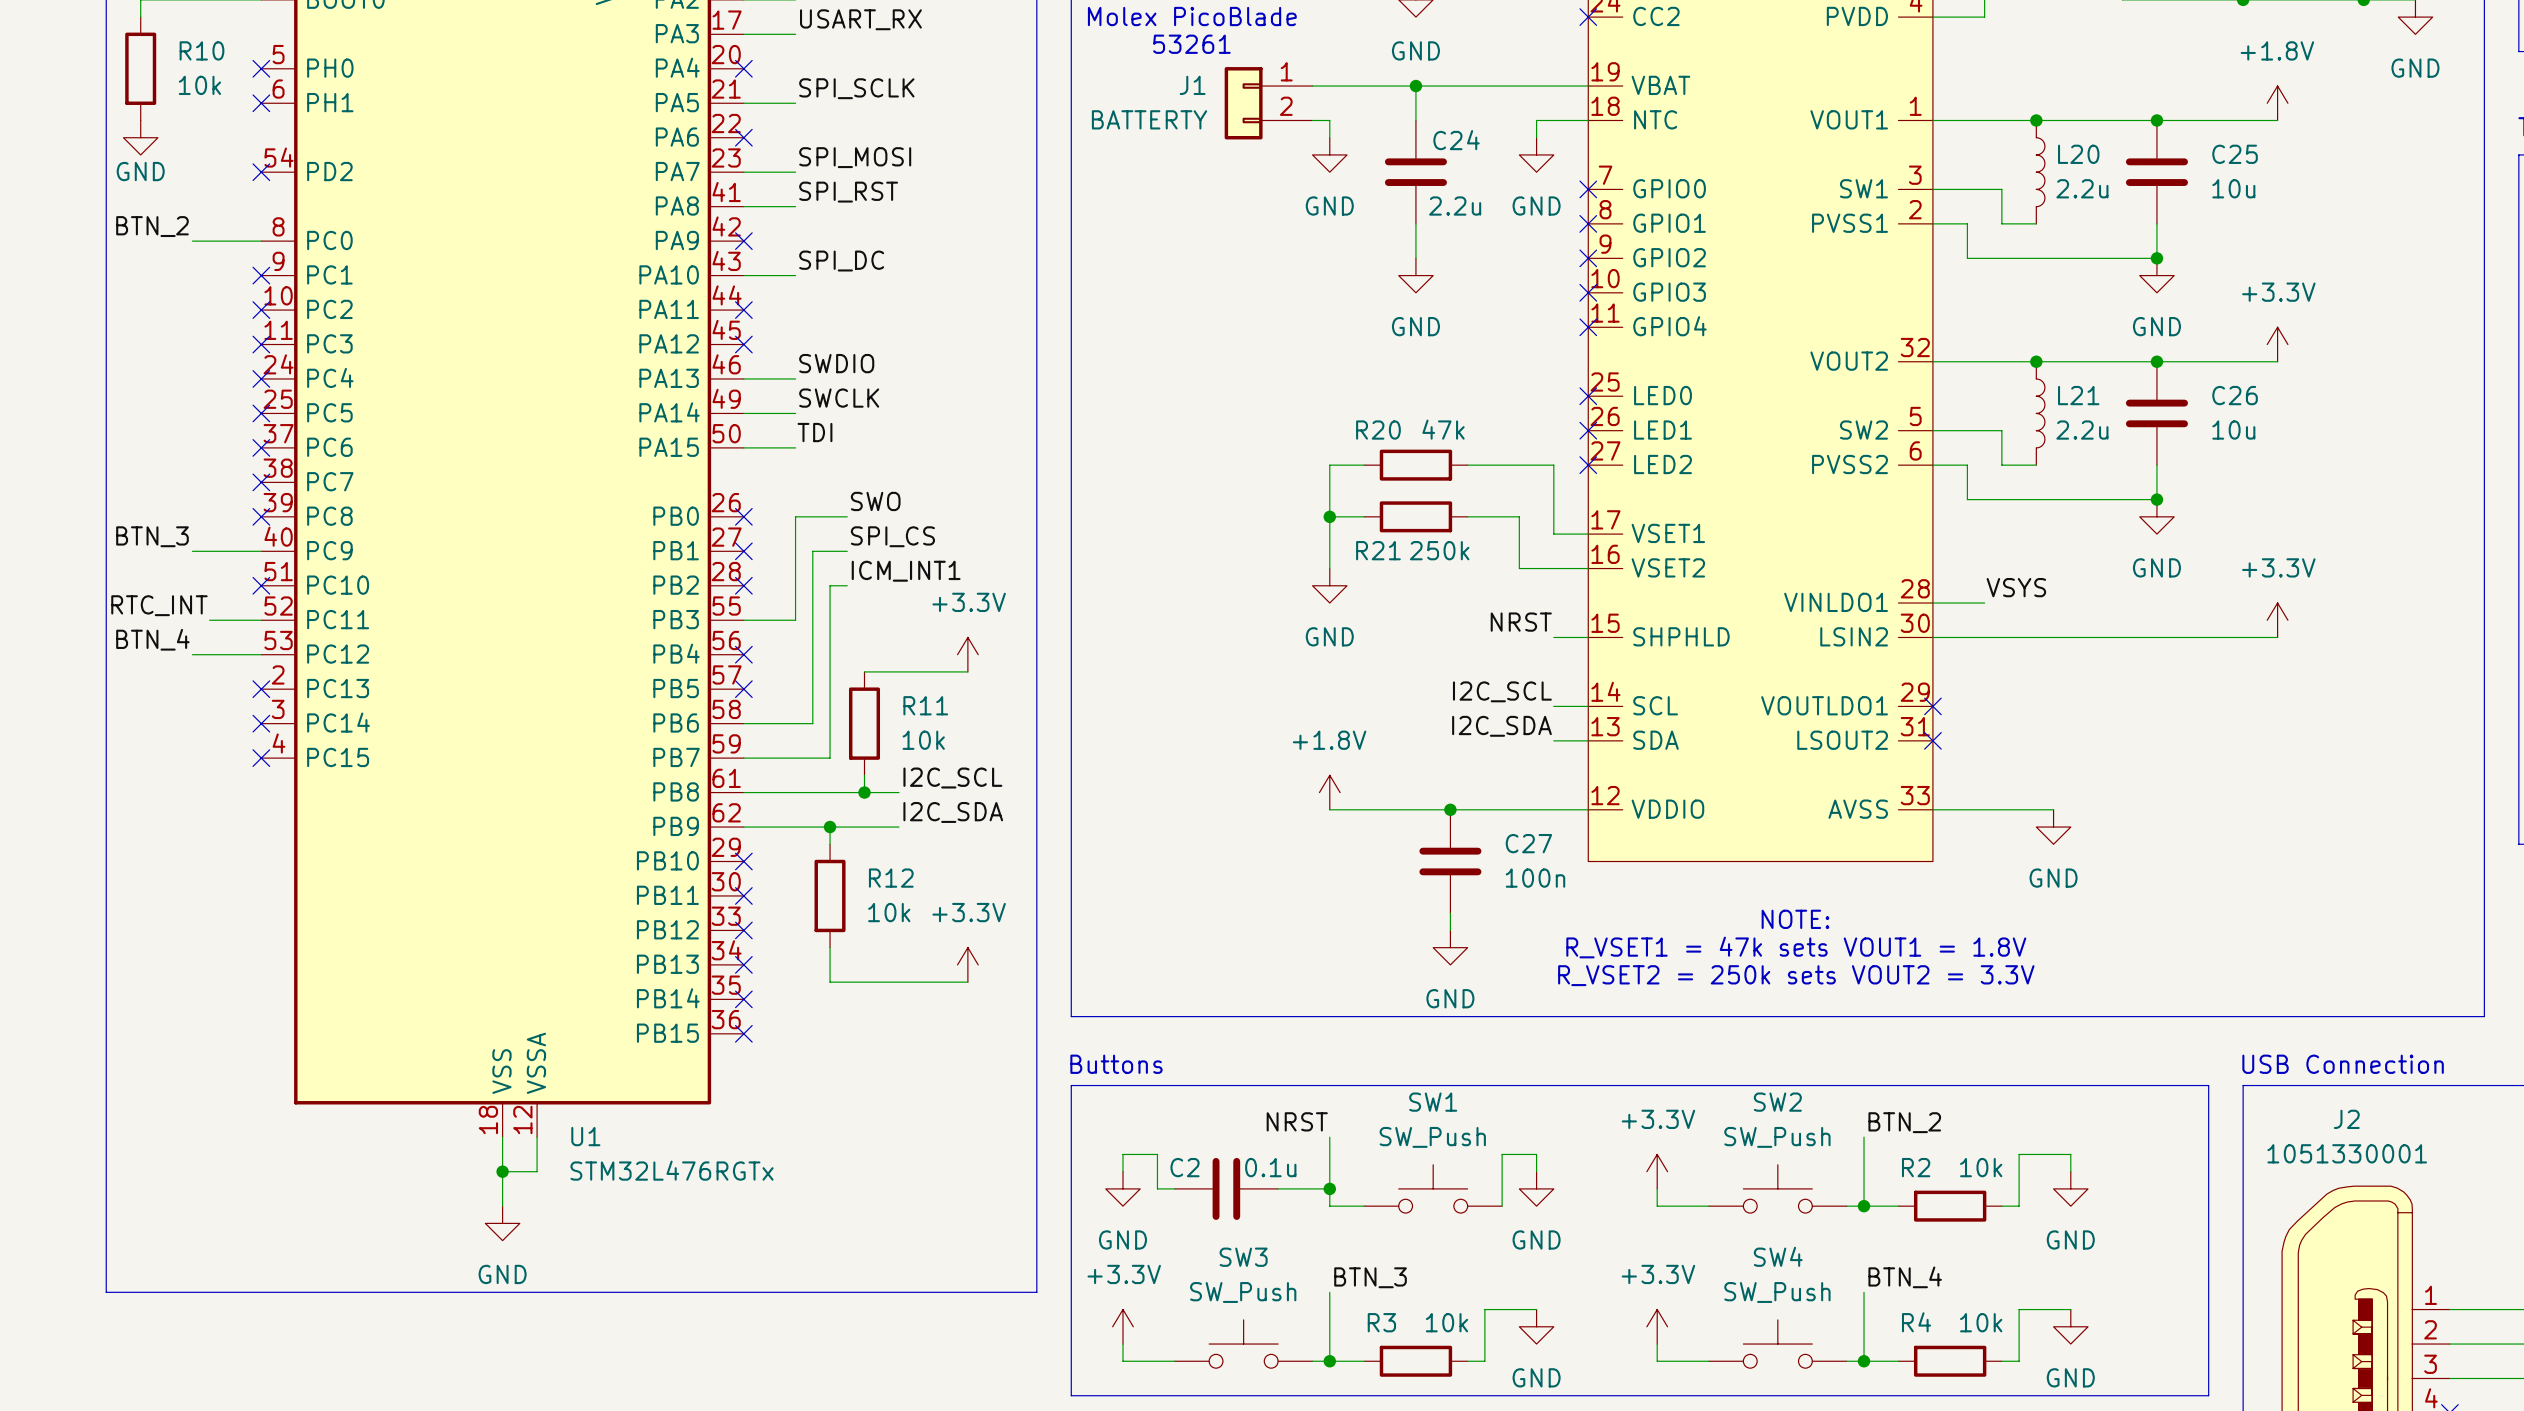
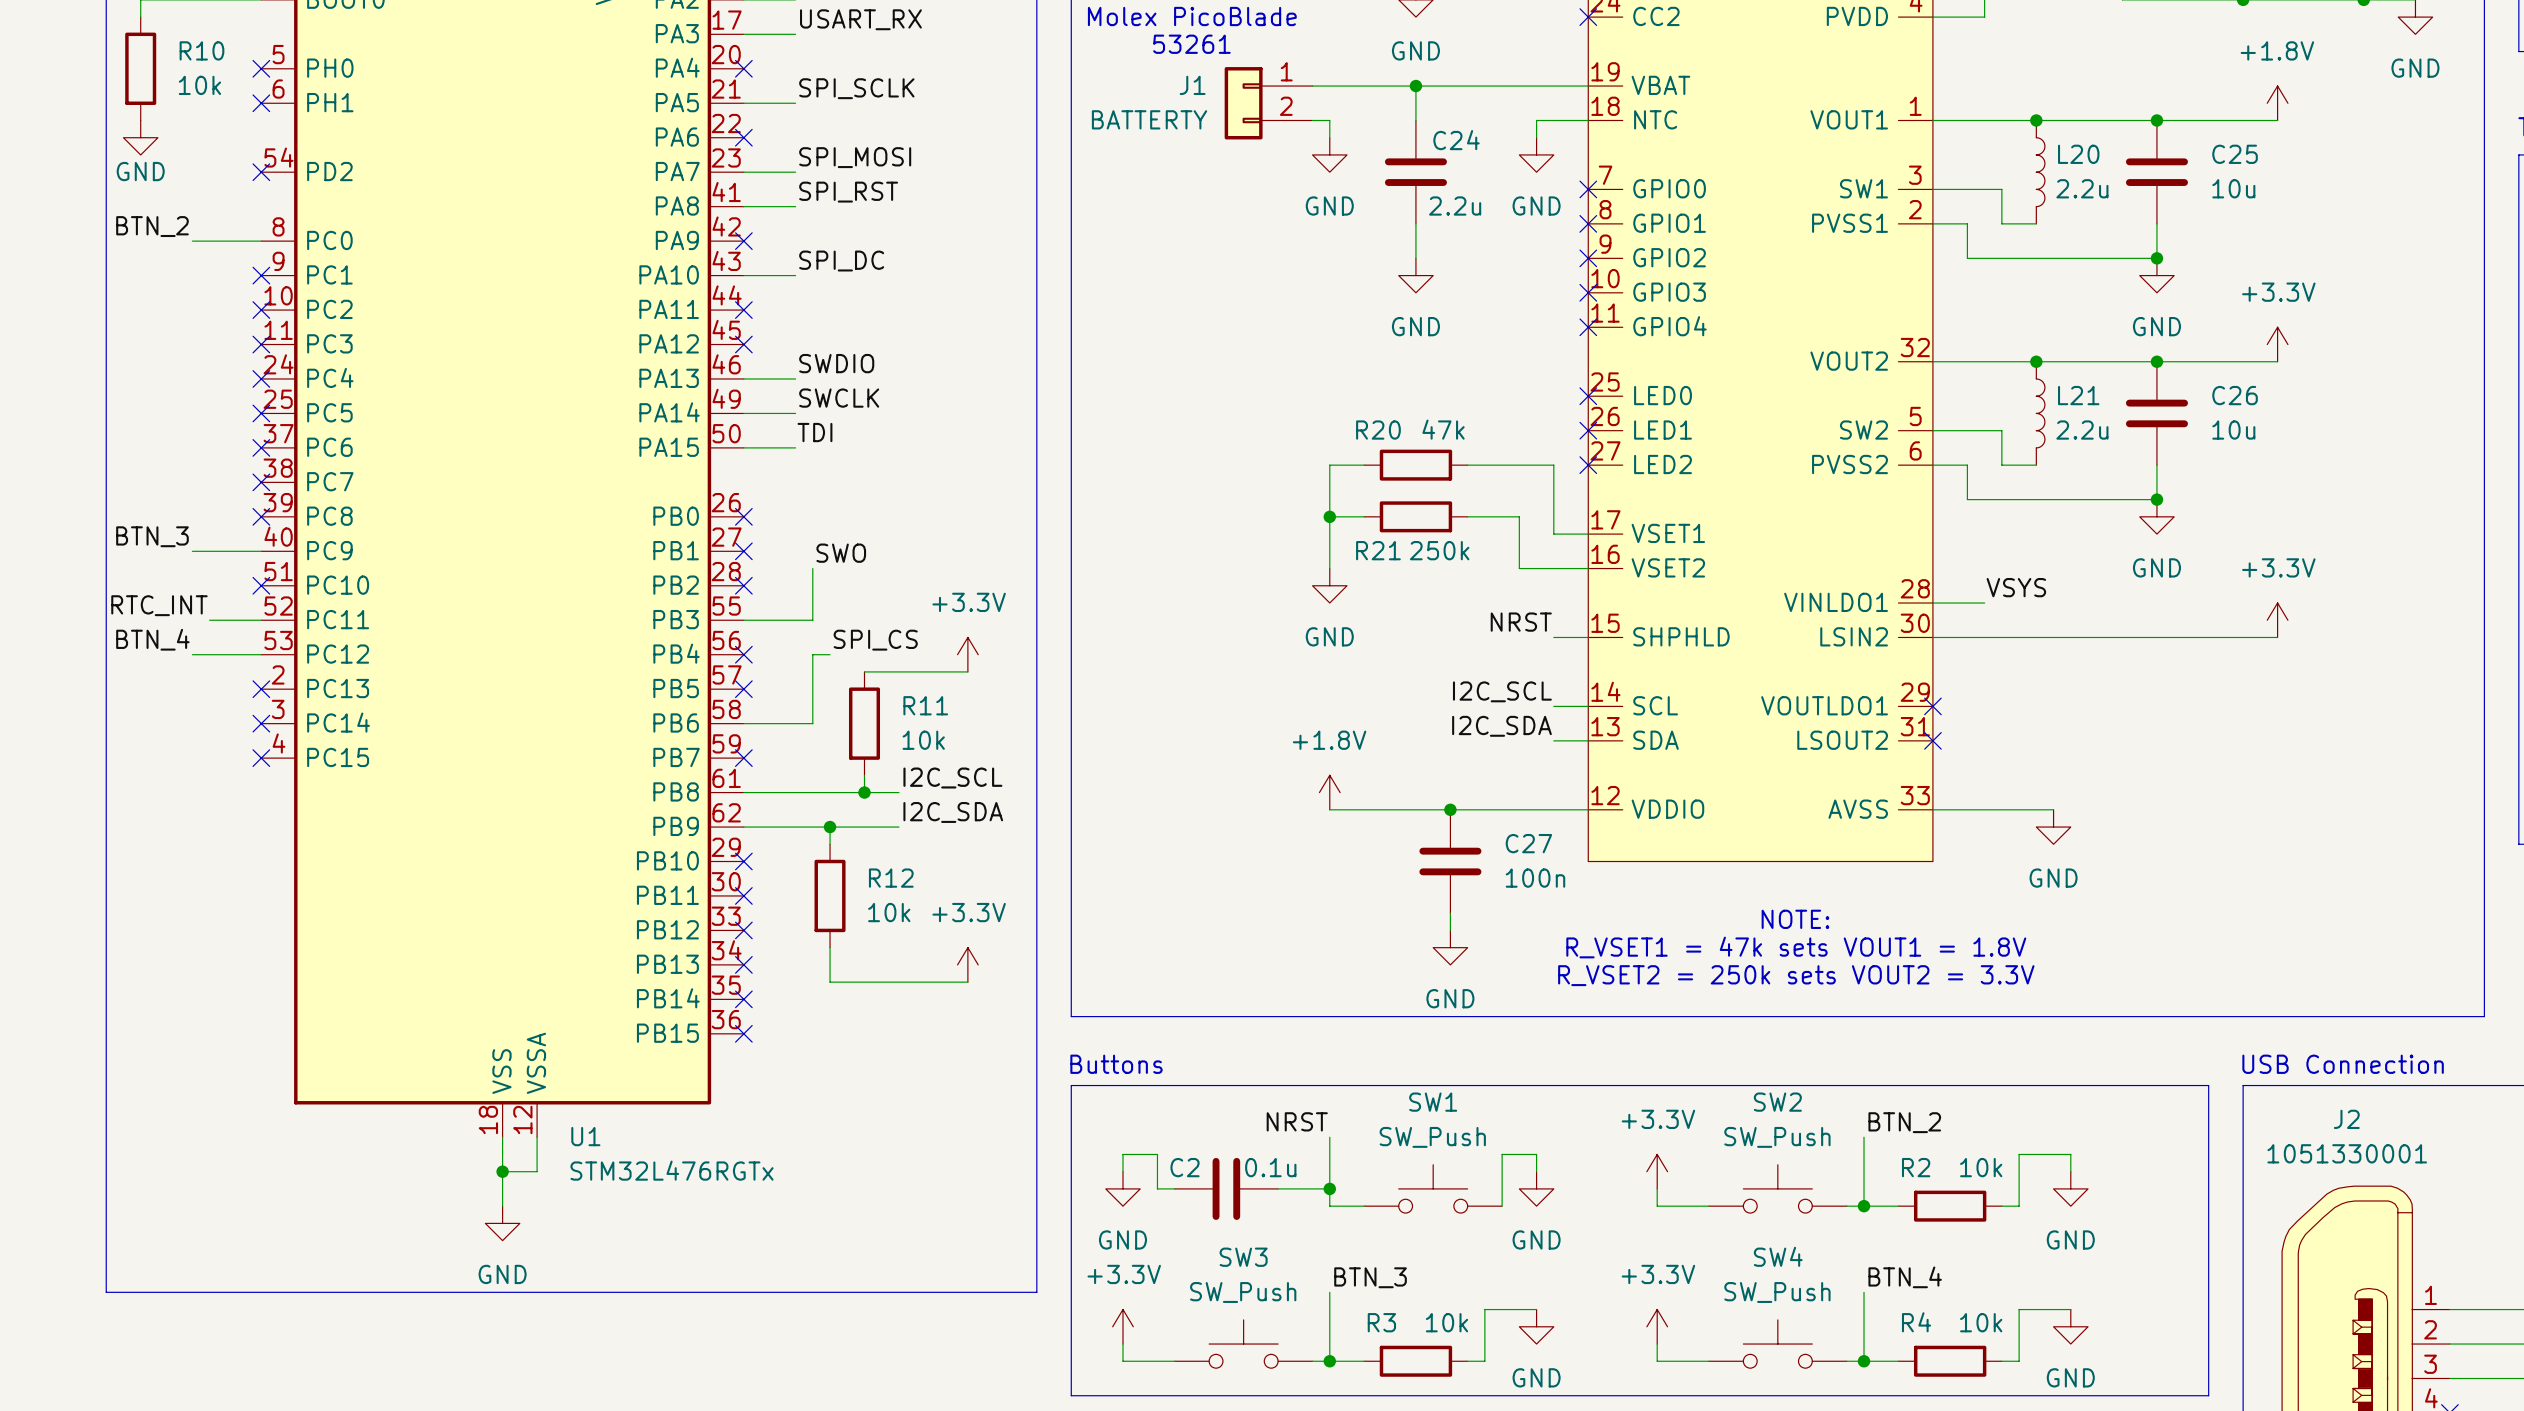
label position: SWO (875, 501) -> SWO (841, 553)
wire: (847, 516) (795, 516) (795, 620) -> none
label position: SPI_CS (892, 536) -> SPI_CS (875, 640)
wire: (847, 551) (812, 551) (812, 568) -> none
label: ICM_INT1 (906, 571) -> none
wire: (847, 585) (830, 585) (830, 758) (743, 758) -> none
wire: (812, 620) (812, 654) -> (812, 620) (795, 620)
wire: none -> (812, 654) (830, 654)
no-connect mark: none -> (743, 758)

